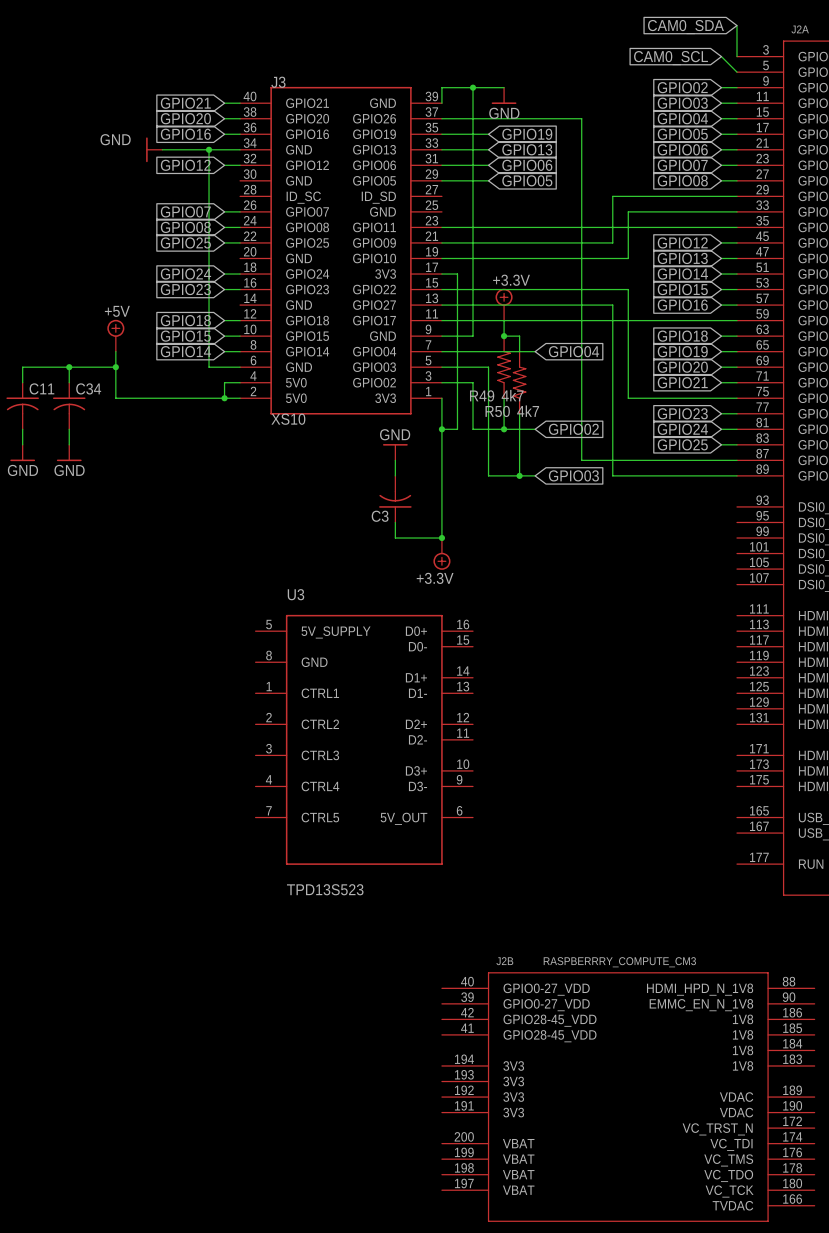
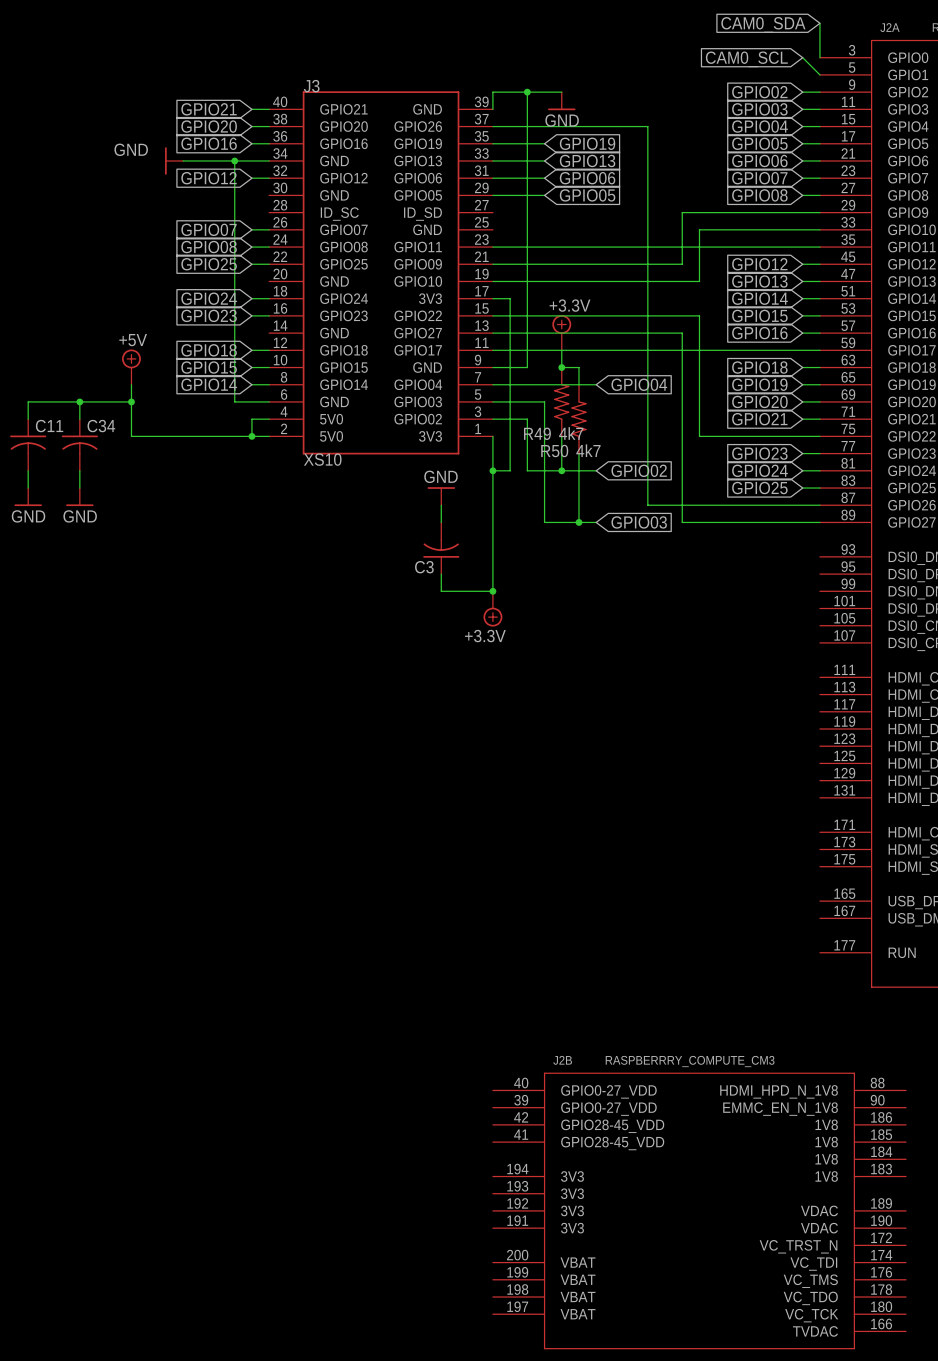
U3: TPD13S523 (364, 739) -> none

